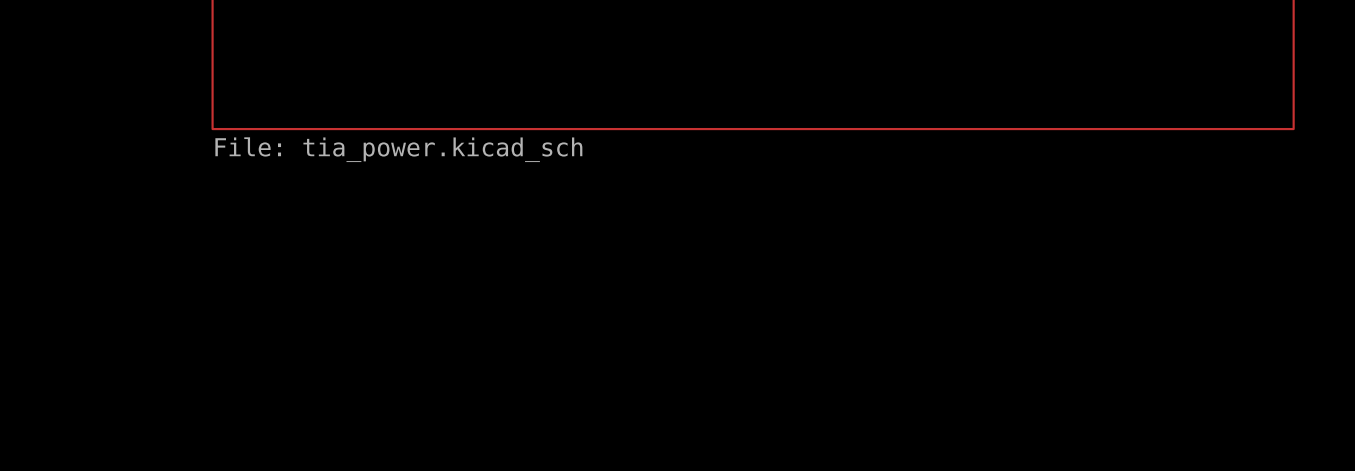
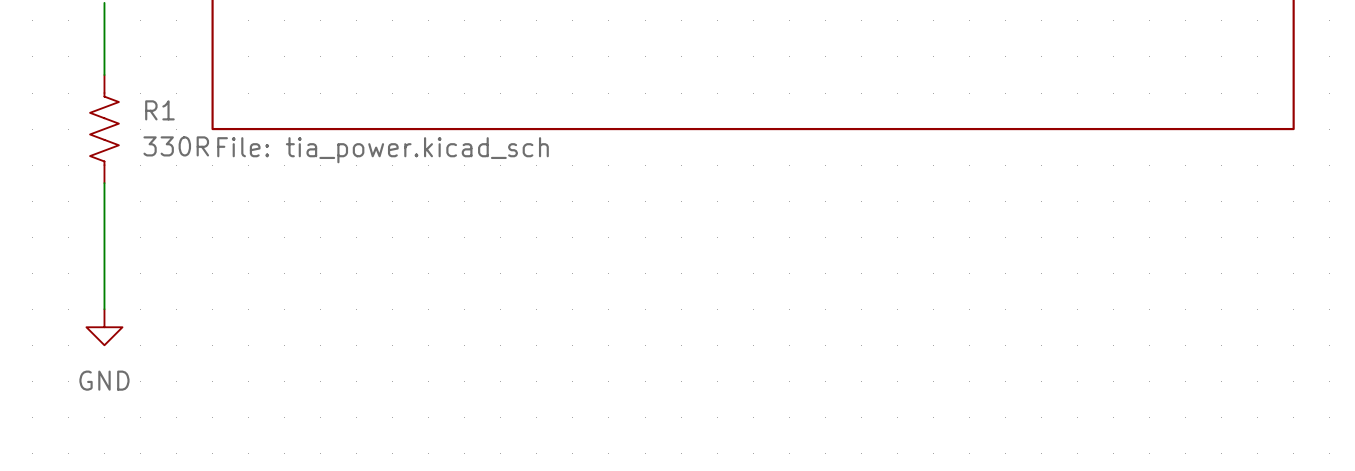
wire: none -> (104, 2) (104, 75)
R1: none -> 330R (104, 129)
wire: none -> (104, 183) (104, 309)
power symbol: none -> GND (104, 327)

